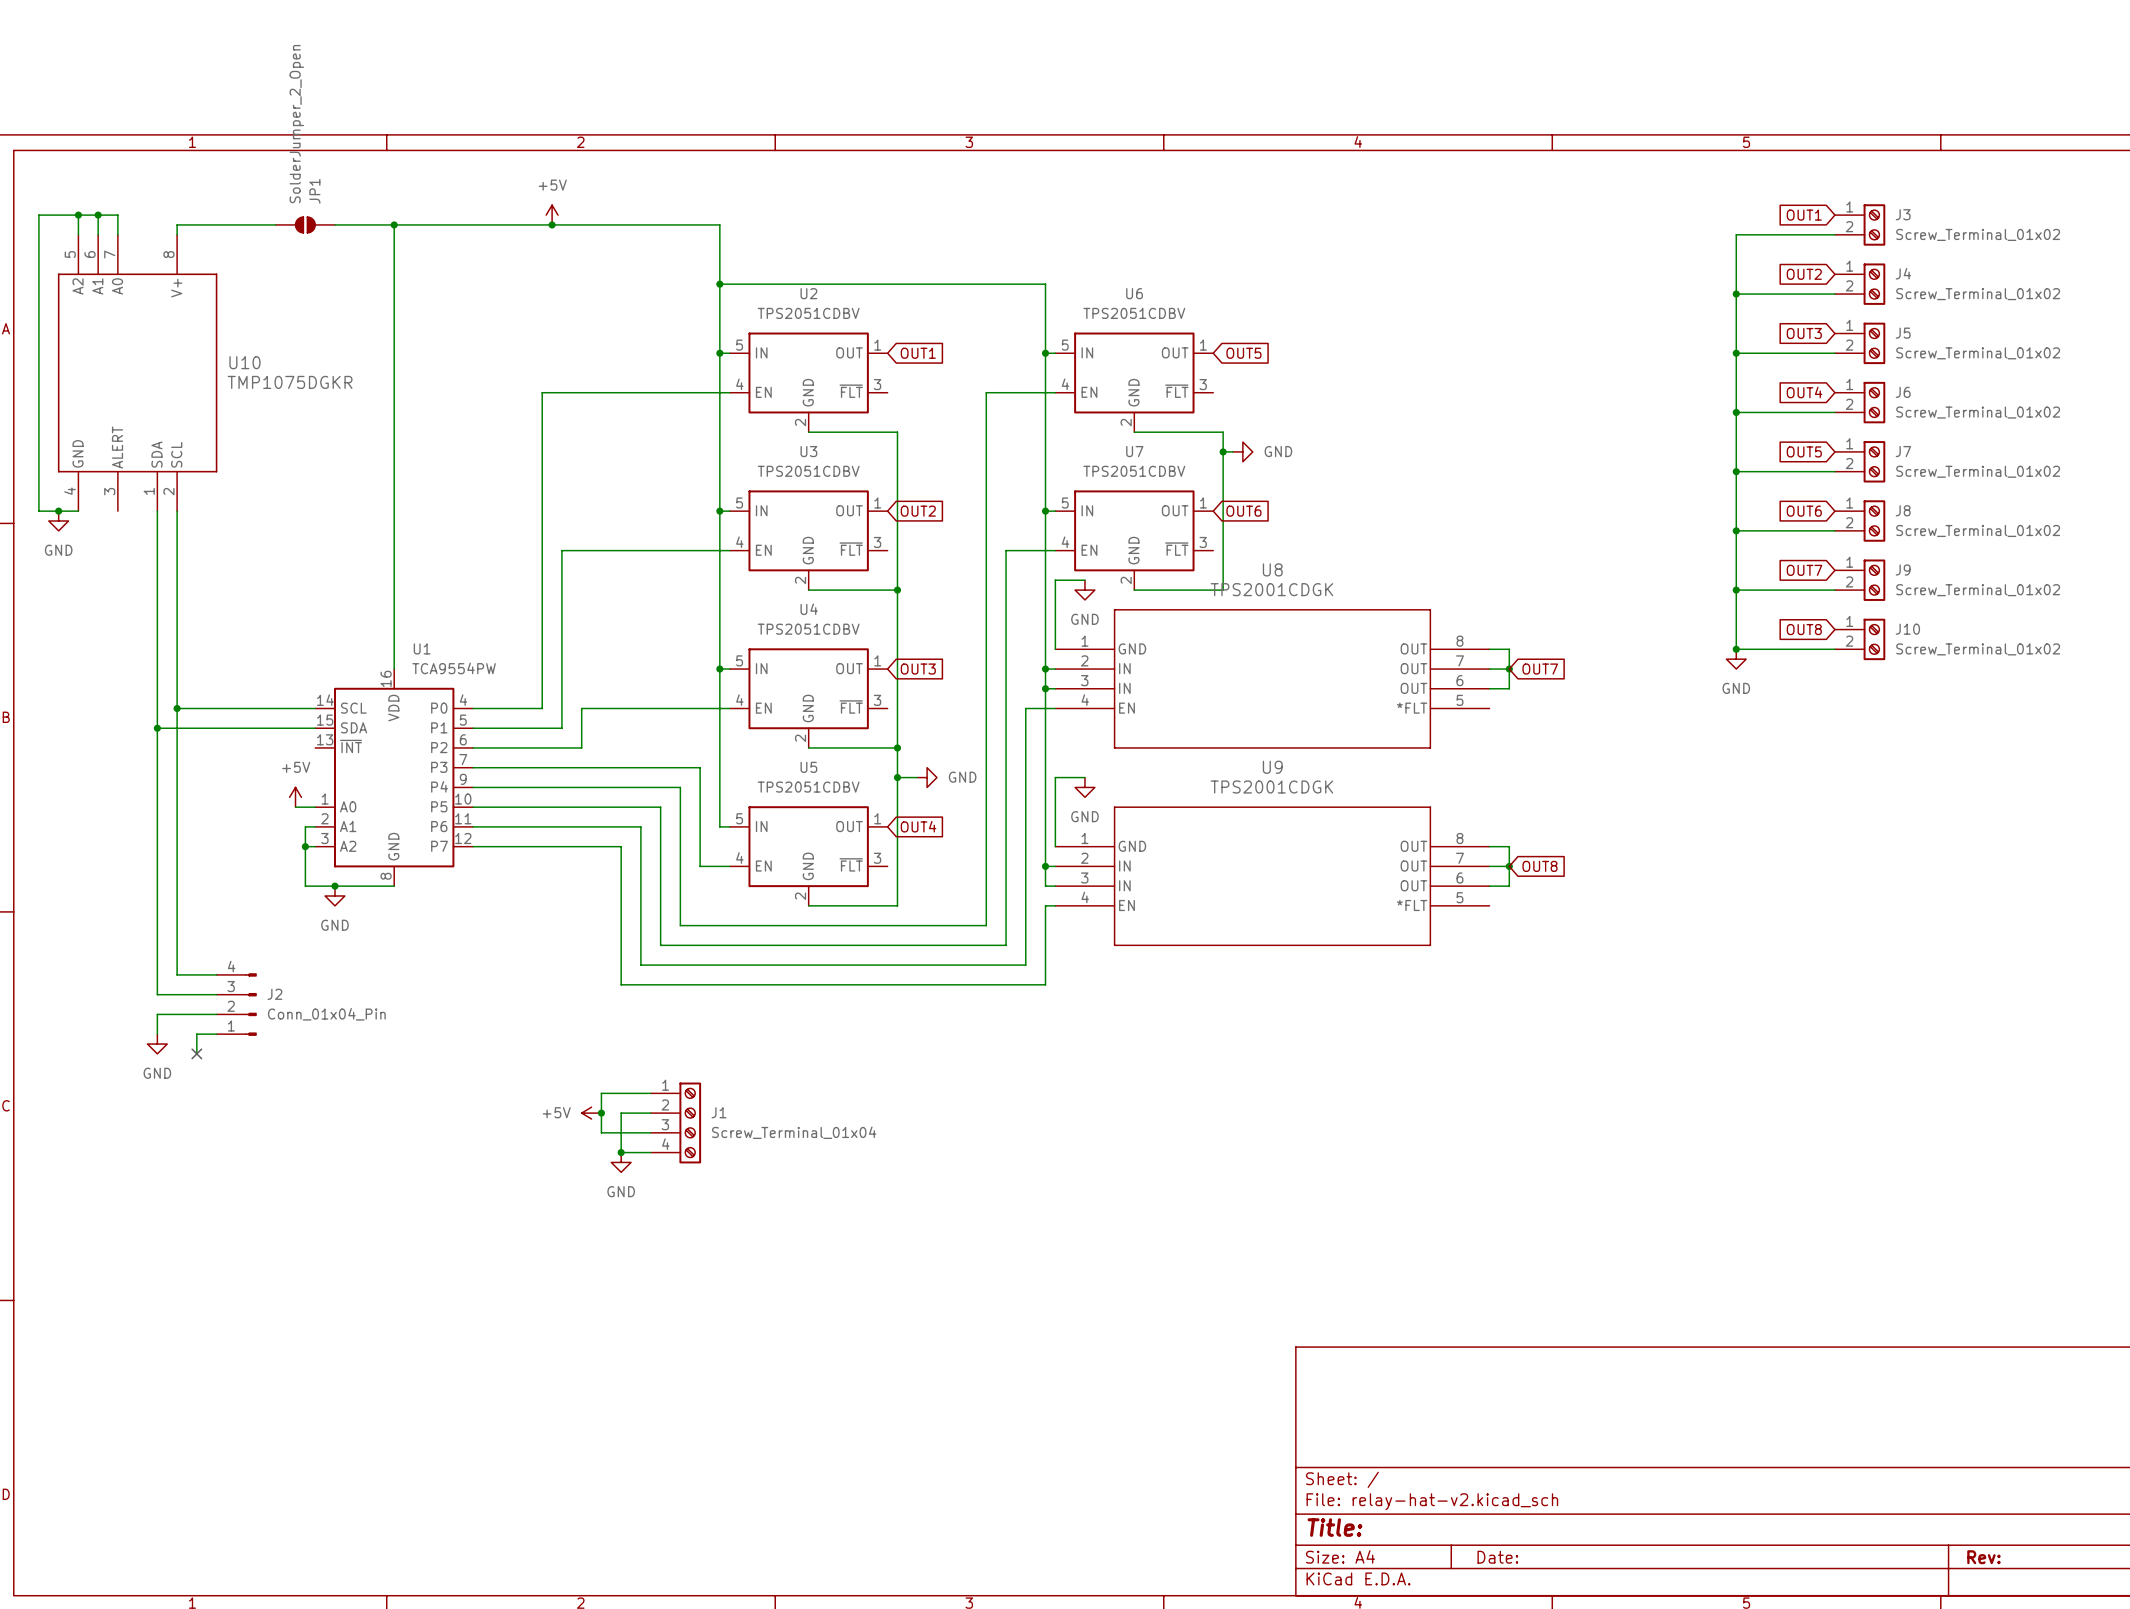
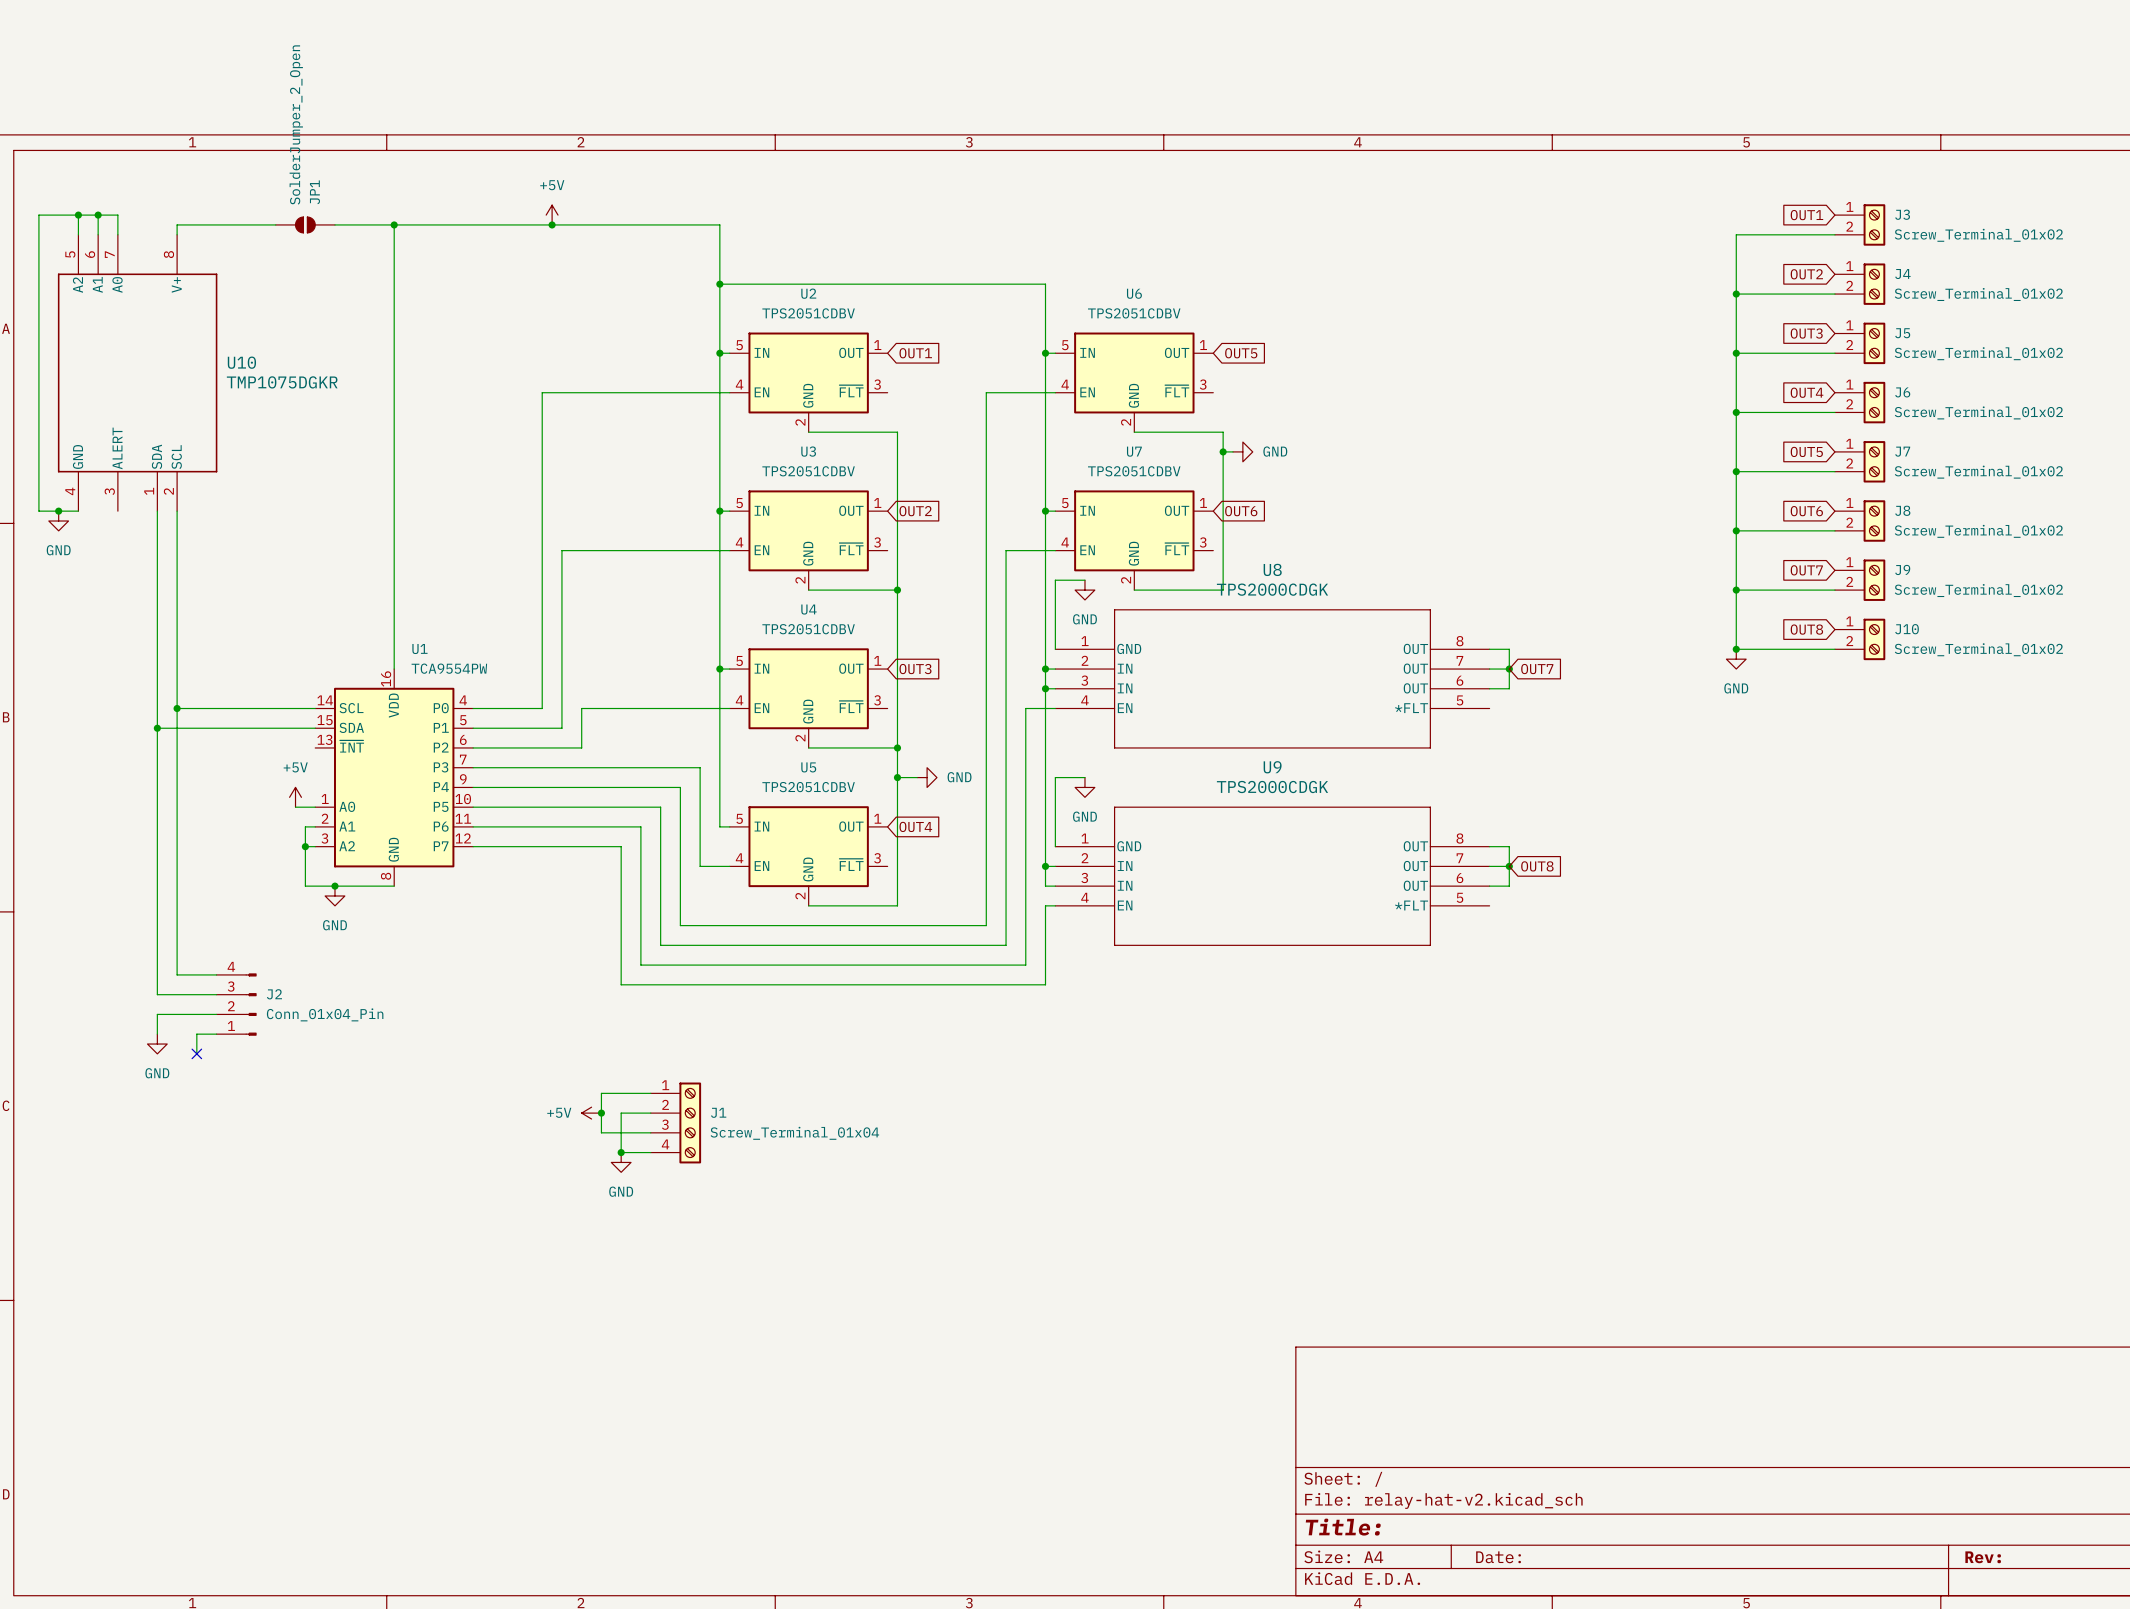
U8 value: TPS2001CDGK (1271, 589) -> TPS2000CDGK (1272, 589)
U9 value: TPS2001CDGK (1271, 787) -> TPS2000CDGK (1272, 787)

